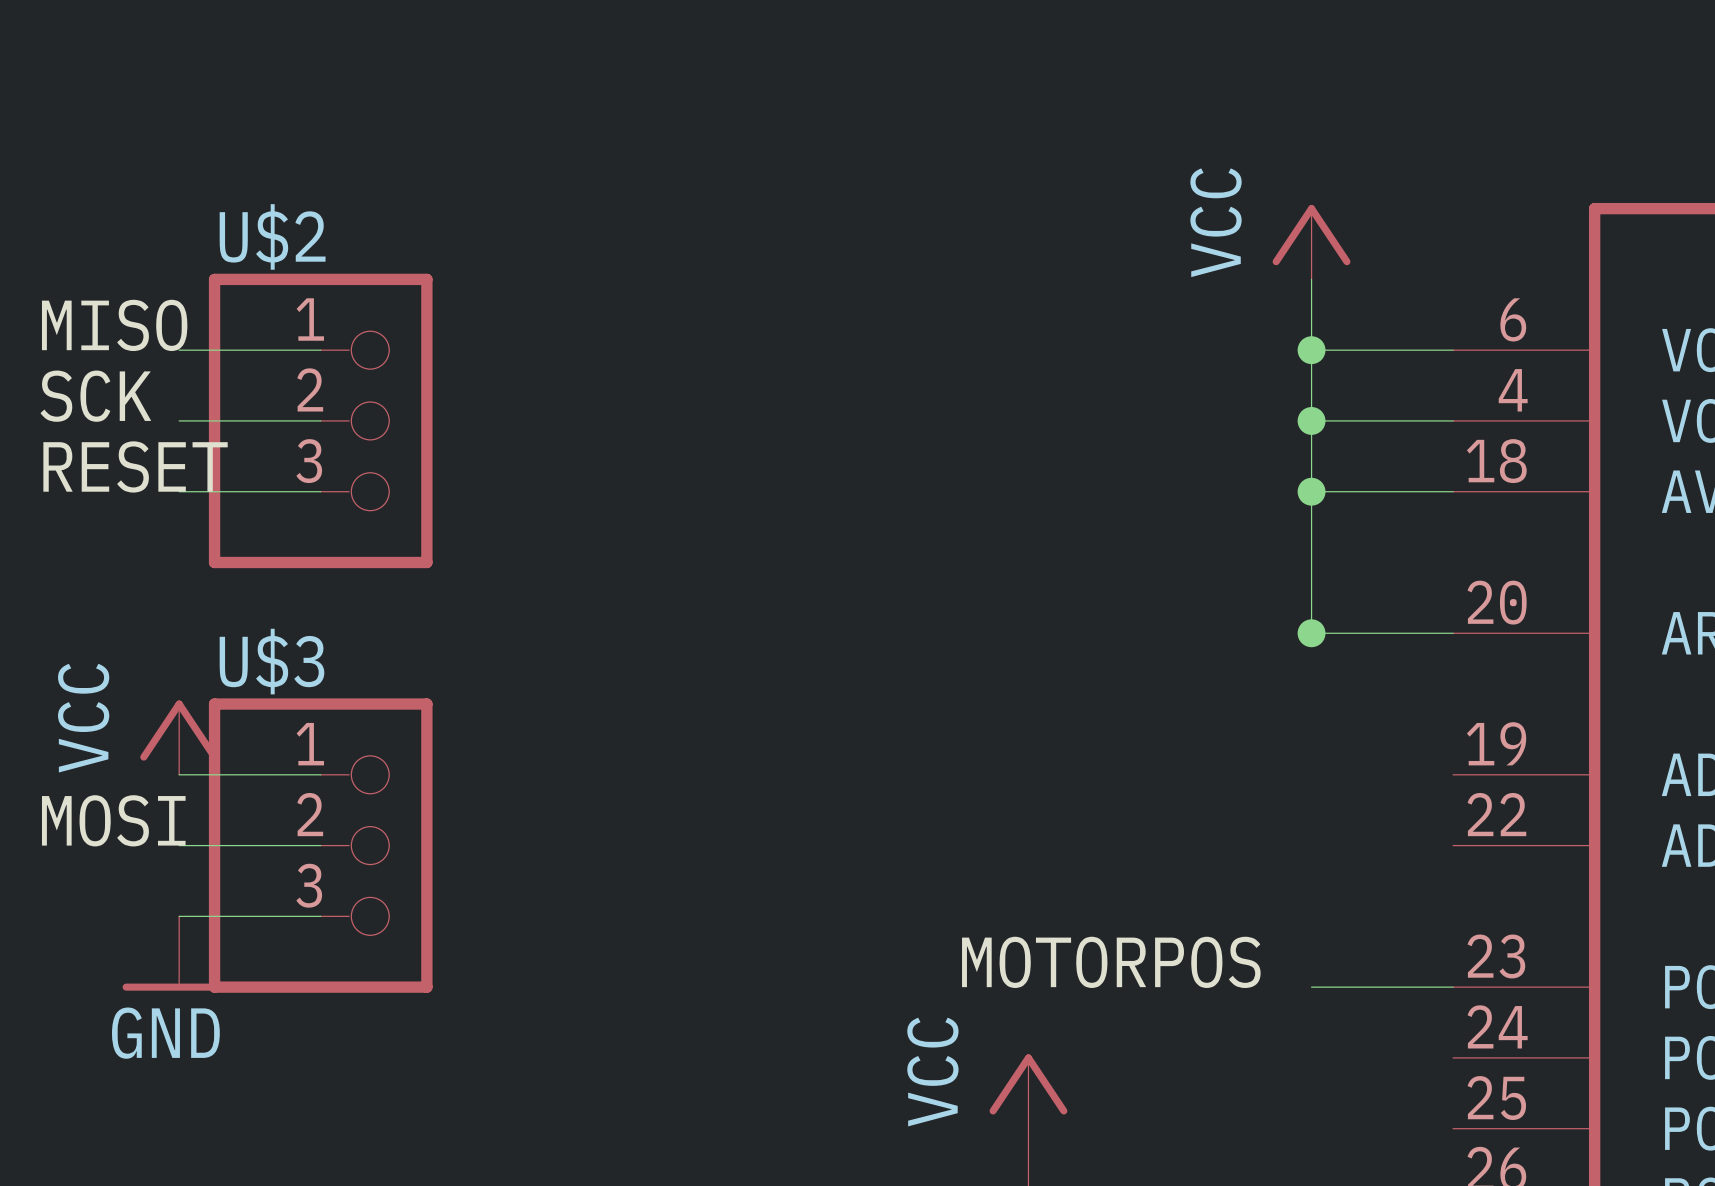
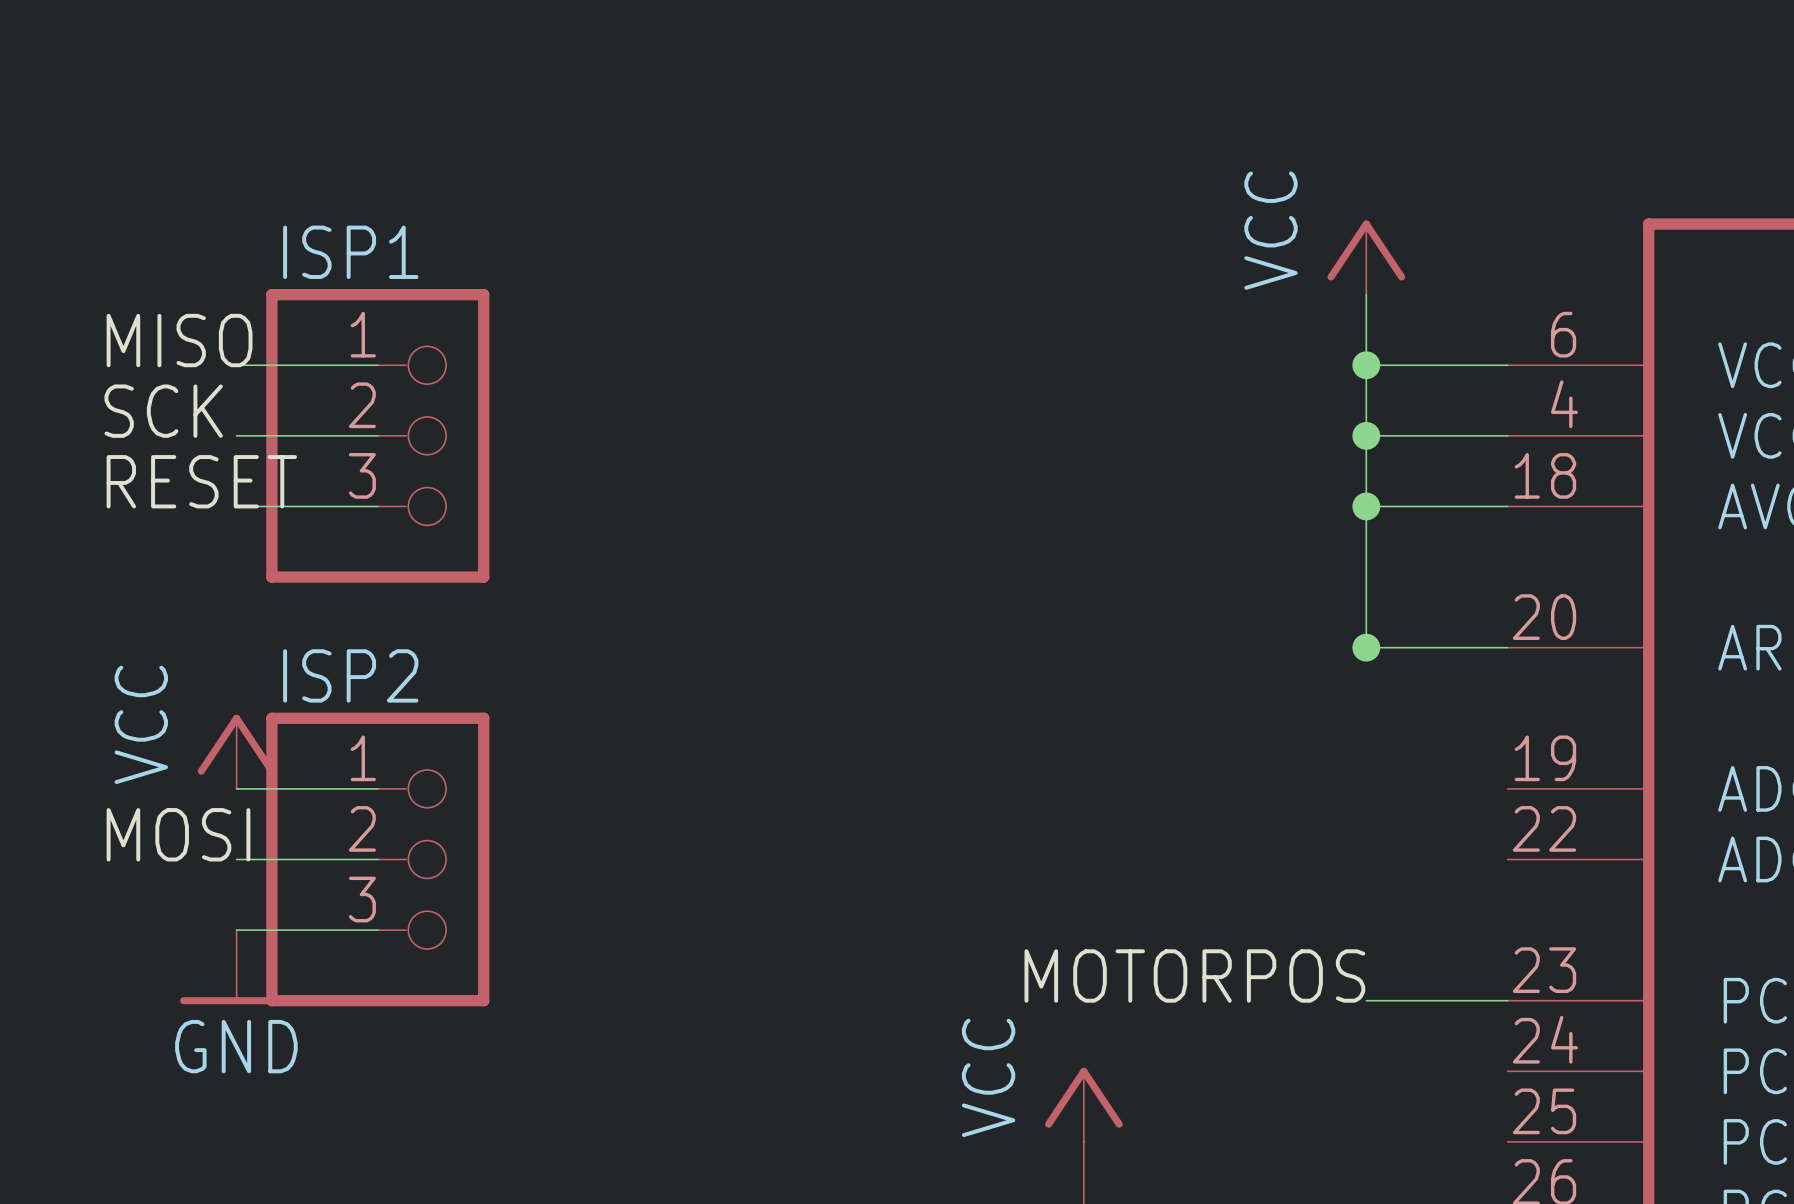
U$2 name: U$2 (272, 236) -> ISP1 (350, 252)
U$3 name: U$3 (271, 661) -> ISP2 (350, 675)

